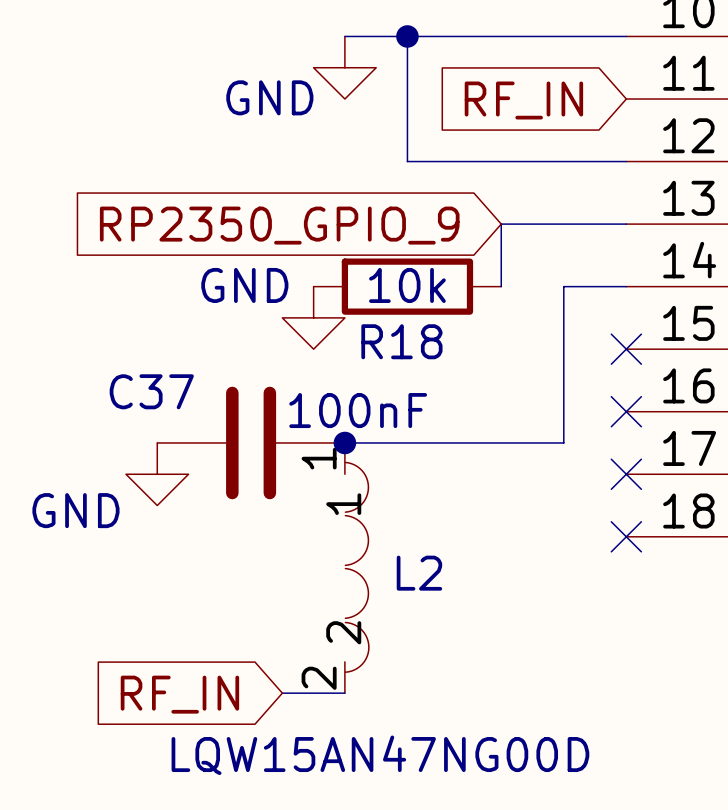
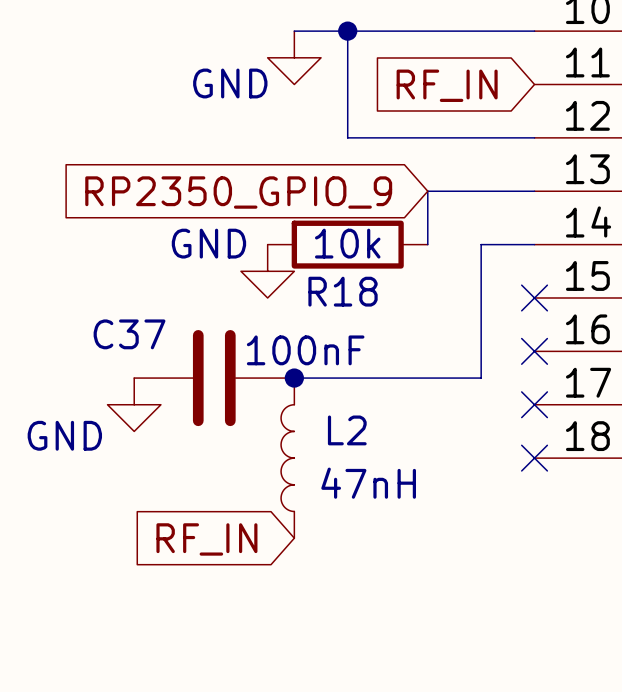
L2 symbol: [344, 442, 369, 694] -> [281, 378, 295, 539]
wire: (282, 693) (344, 693) -> none
global label position: RF_IN (179, 694) -> RF_IN (206, 539)
L2 value: LQW15AN47NG00D (380, 755) -> 47nH (368, 483)

